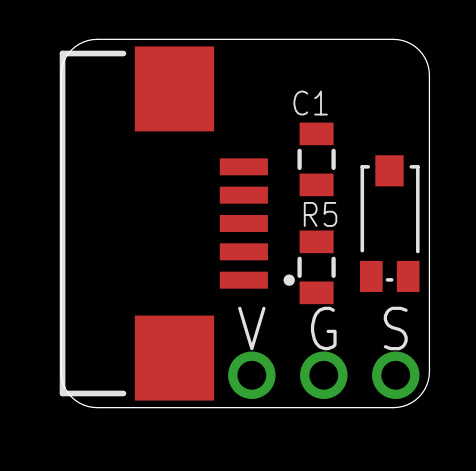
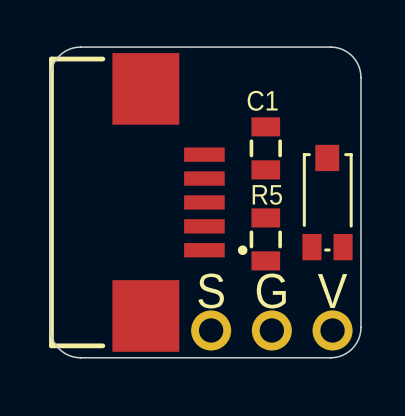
text: V (251, 328) -> S (211, 291)
text: S (395, 328) -> V (332, 291)

